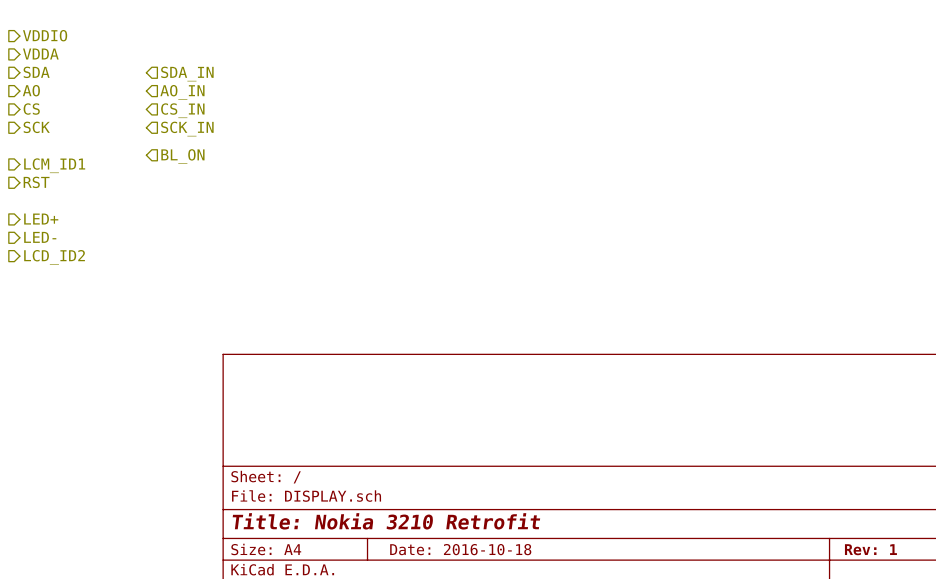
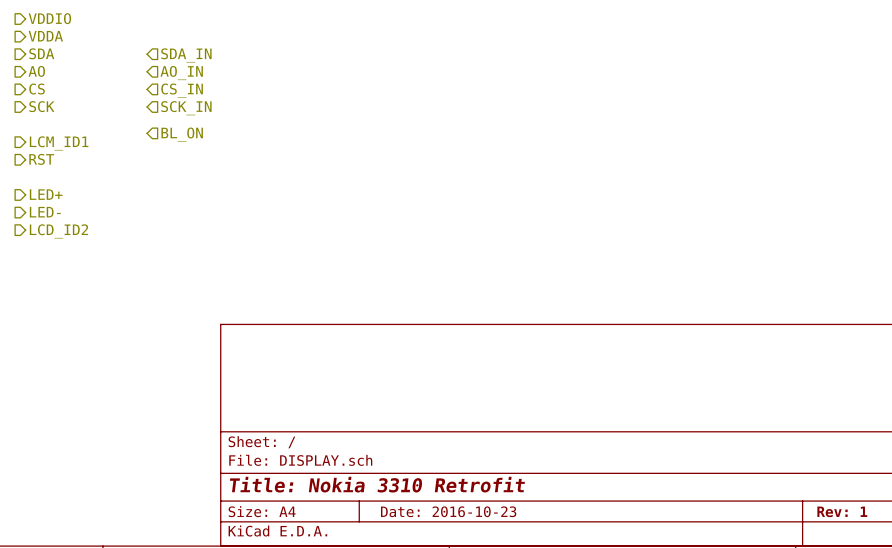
title block: Title: Nokia 3210 Retrofit (386, 521) -> Title: Nokia 3310 Retrofit (377, 484)
title block: Date: 2016-10-18 (460, 549) -> Date: 2016-10-23 (448, 511)

